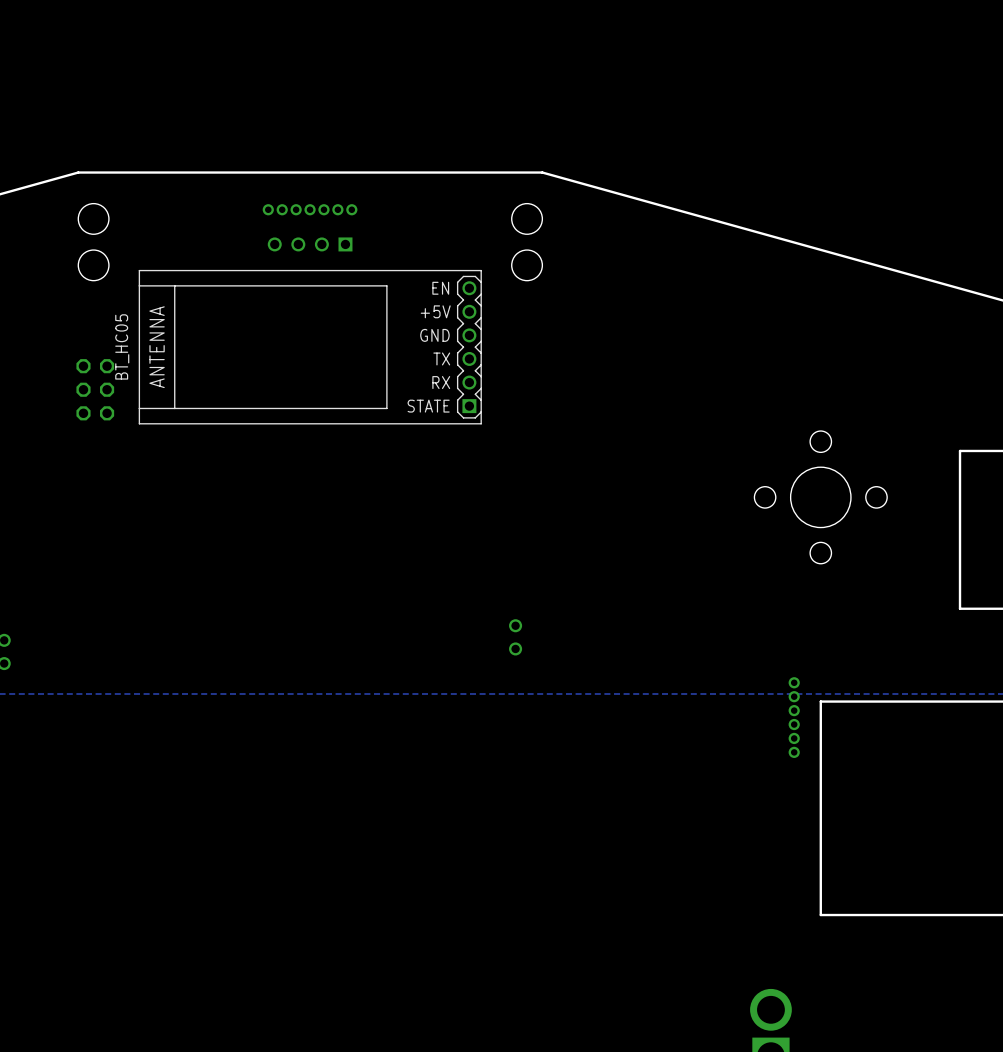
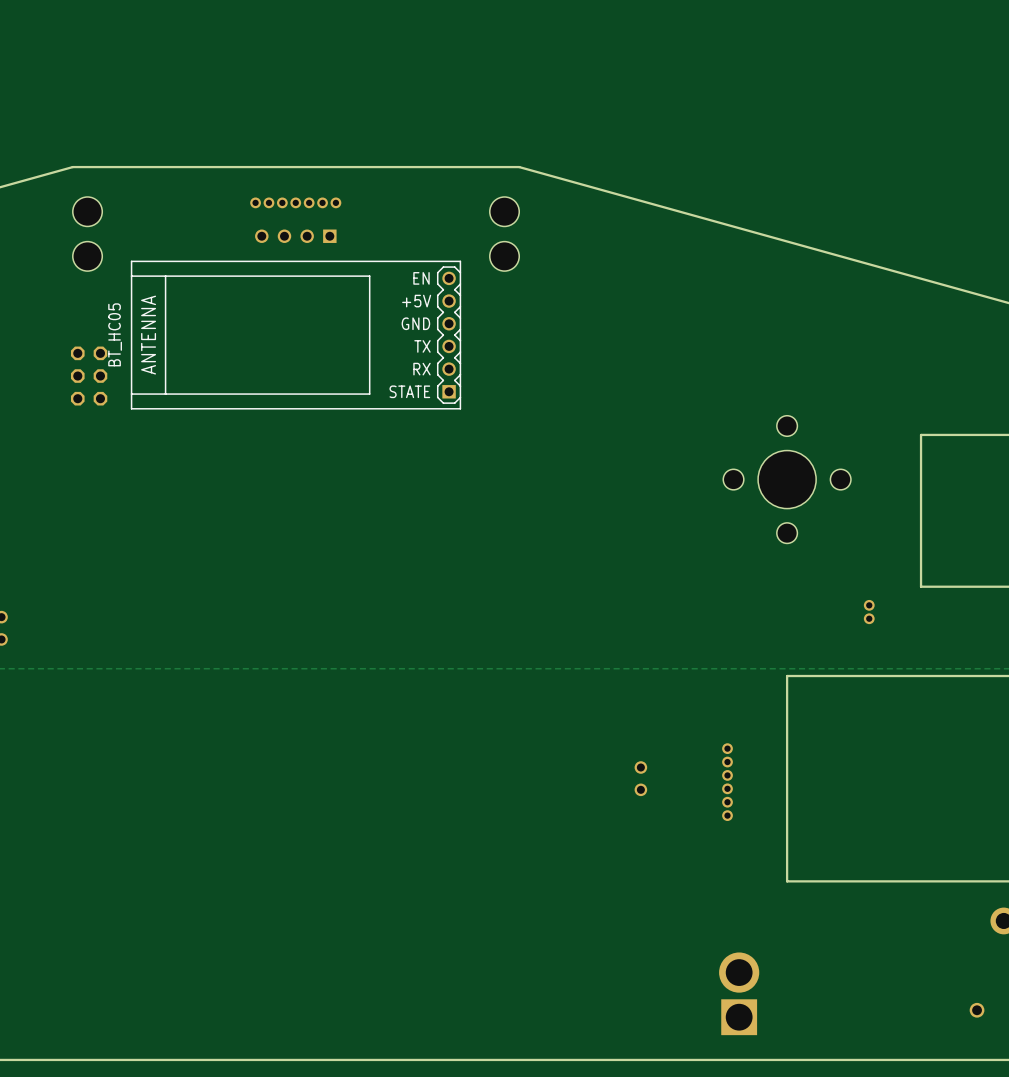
part: none -> (869, 612)
part position: (515, 637) -> (640, 778)
part position: (794, 717) -> (727, 782)

